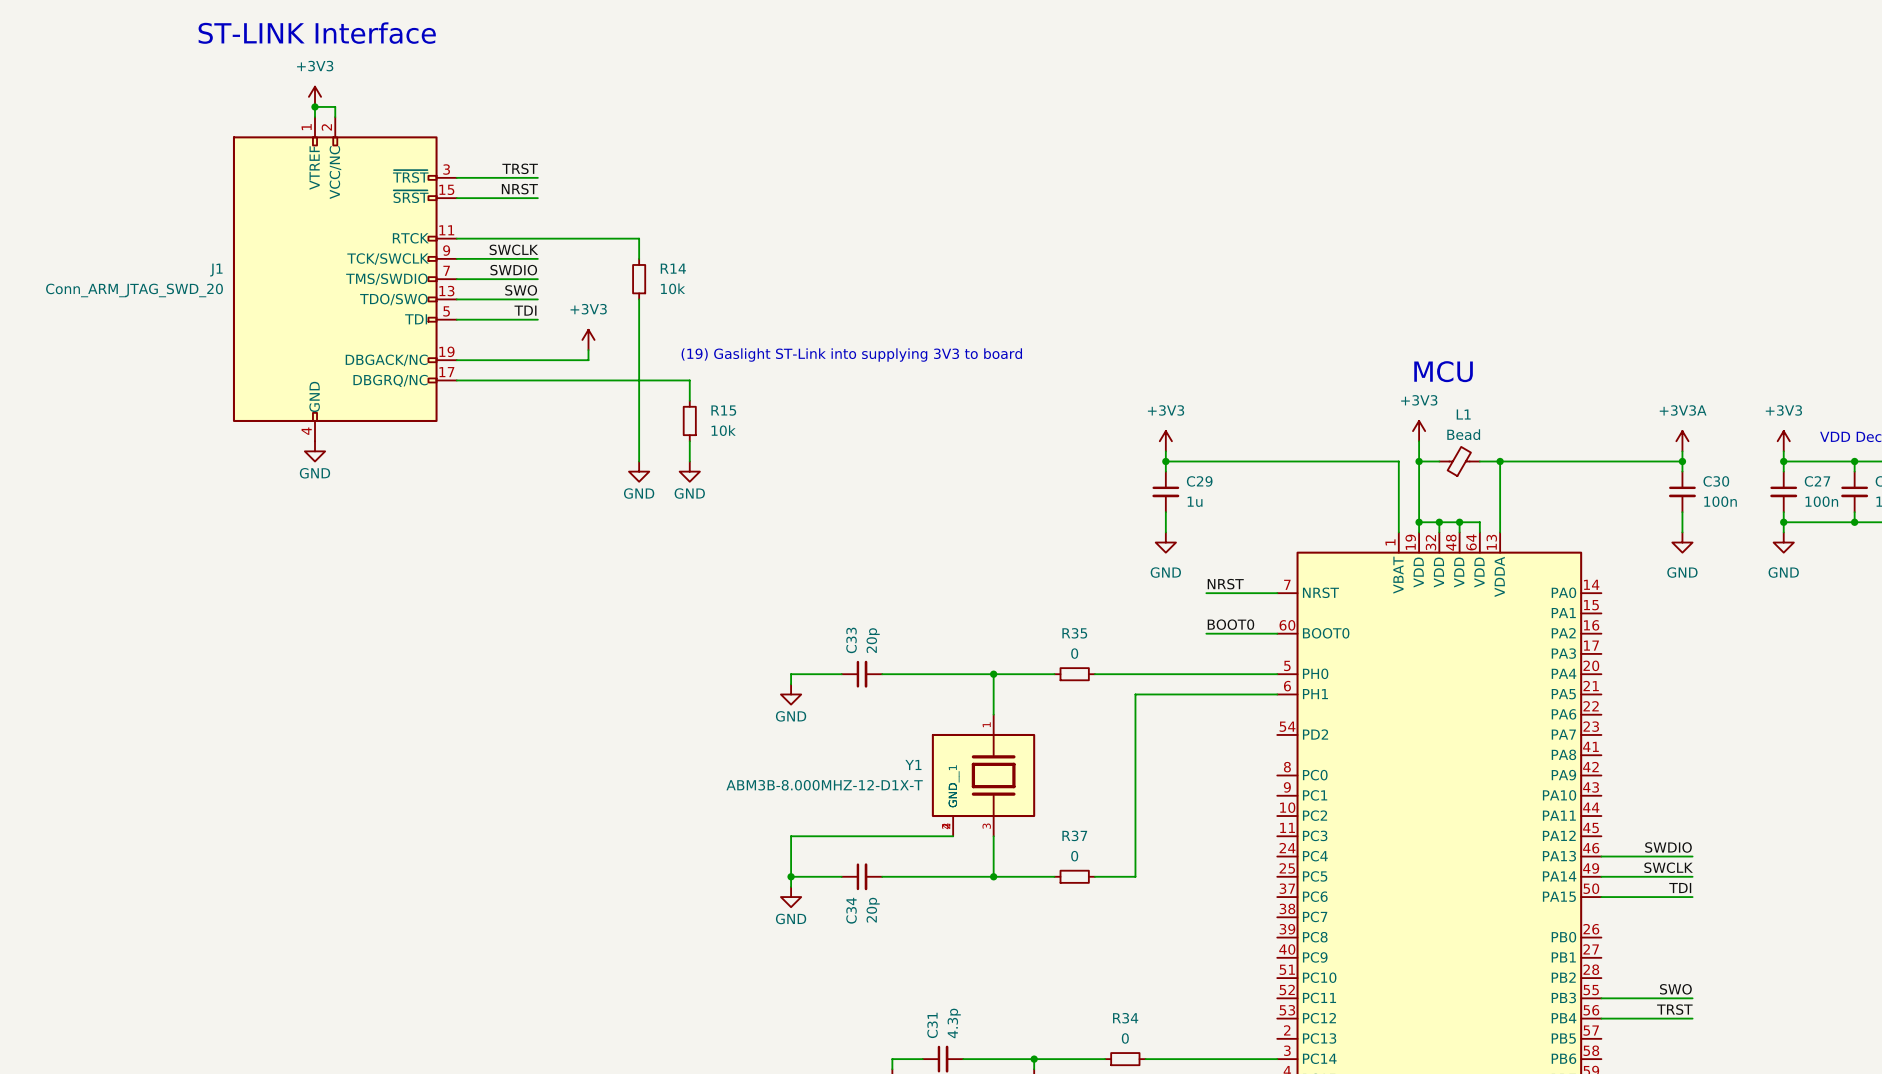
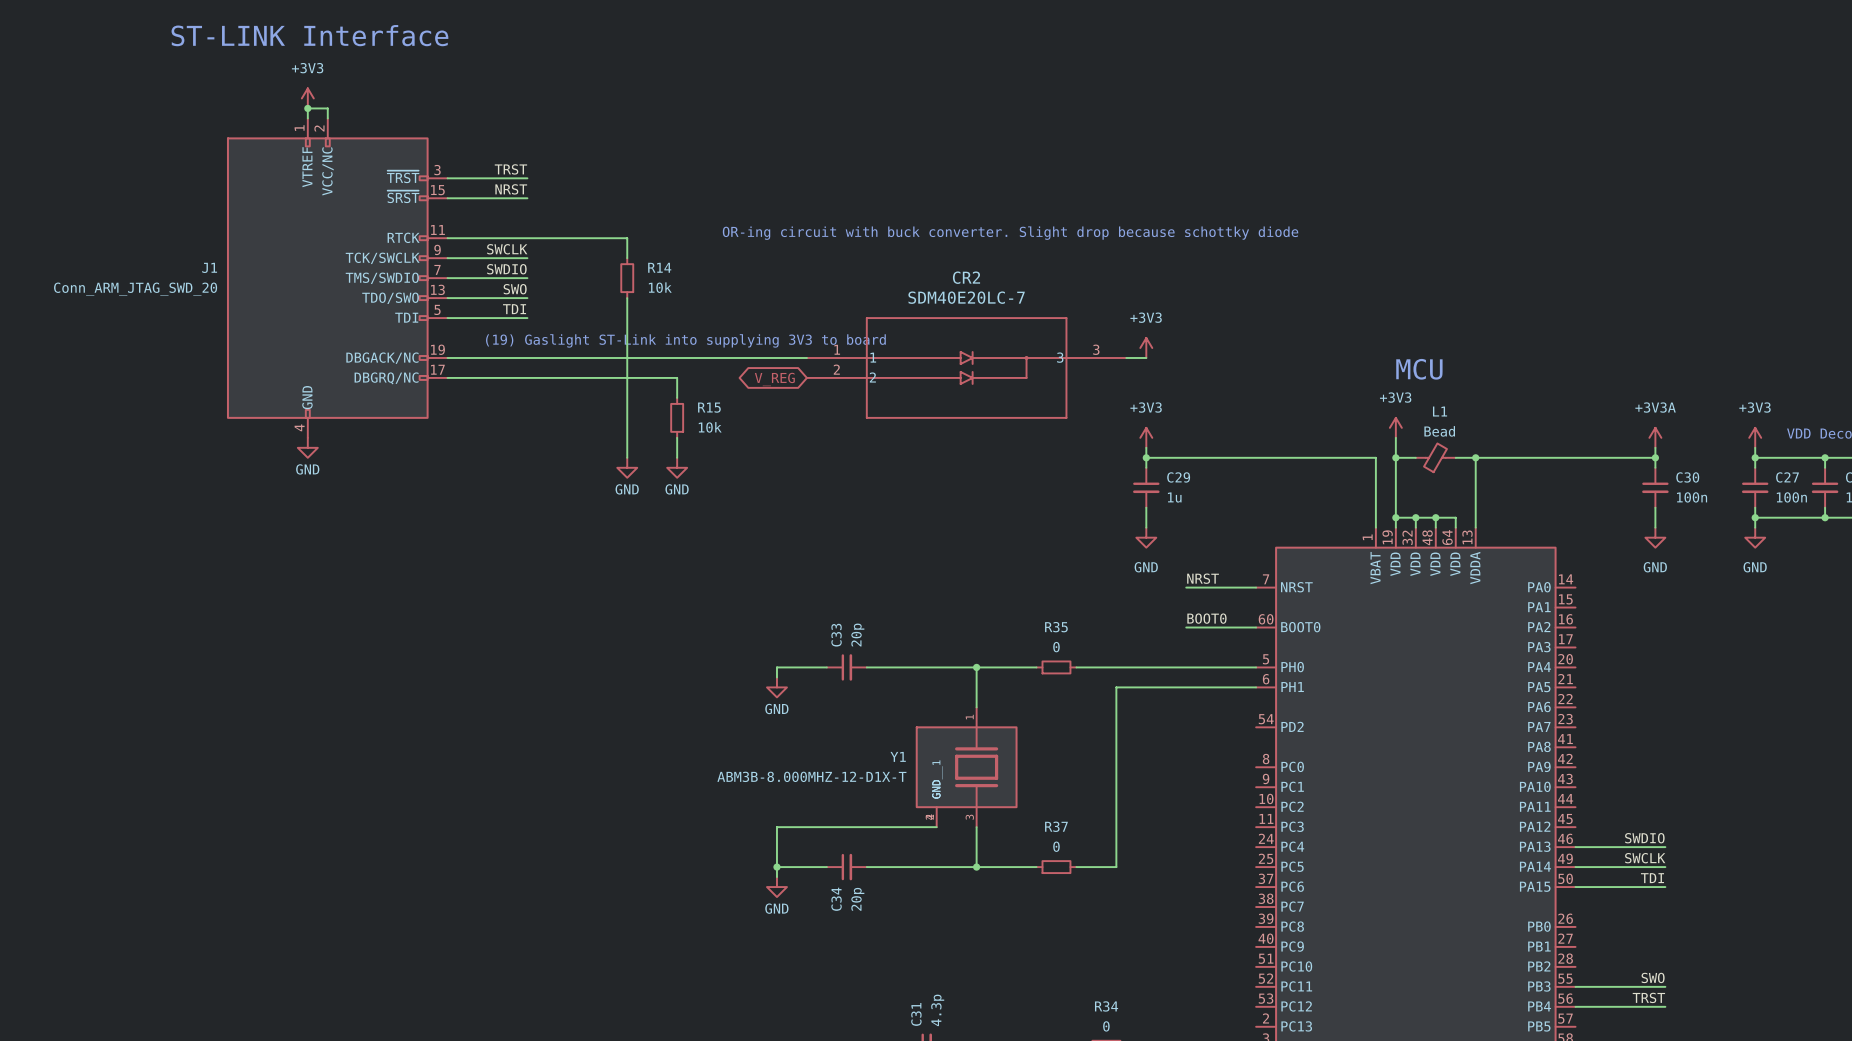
text: none -> OR-ing circuit with buck converter. Slight drop because schottky diode (1010, 233)
power symbol: +3V3 (588, 339) -> none
wire: (588, 350) (588, 360) -> (806, 357) (577, 357)
power symbol: none -> +3V3 (1146, 348)
text position: (19) Gaslight ST-Link into supplying 3V3 to board (851, 355) -> (19) Gaslight ST-Link into supplying 3V3 to board (685, 340)
wire: none -> (1126, 357) (1146, 357)
CR2: none -> SDM40E20LC-7 (966, 367)
global label: none -> V_REG (774, 379)

